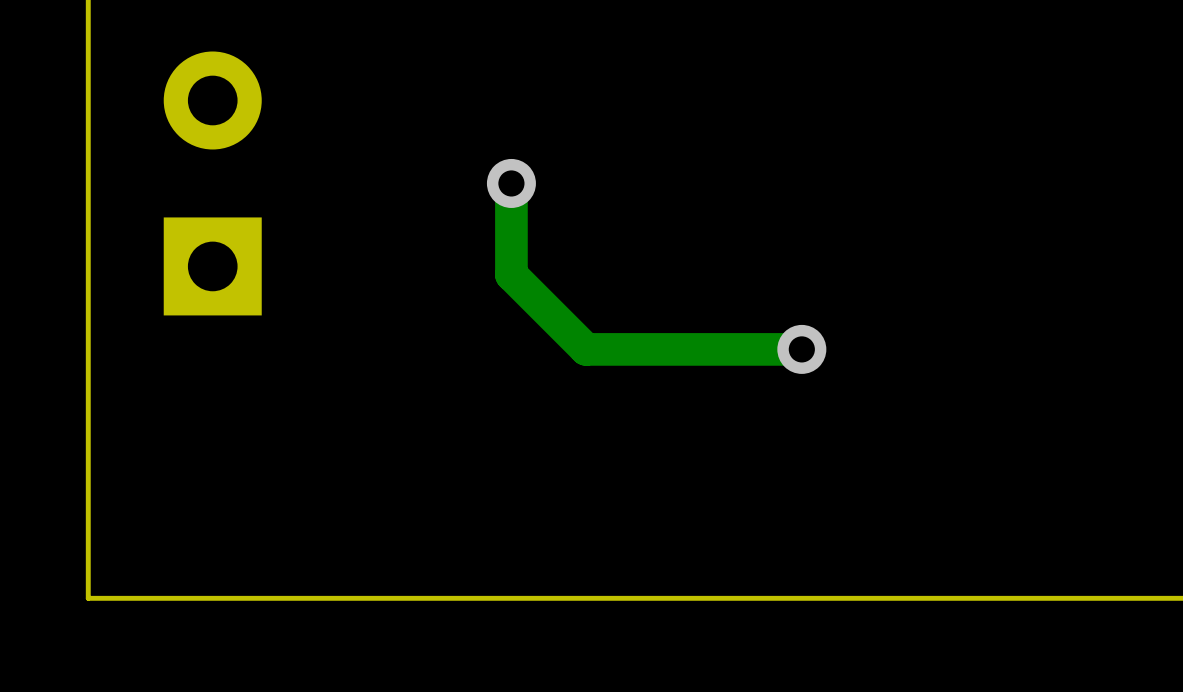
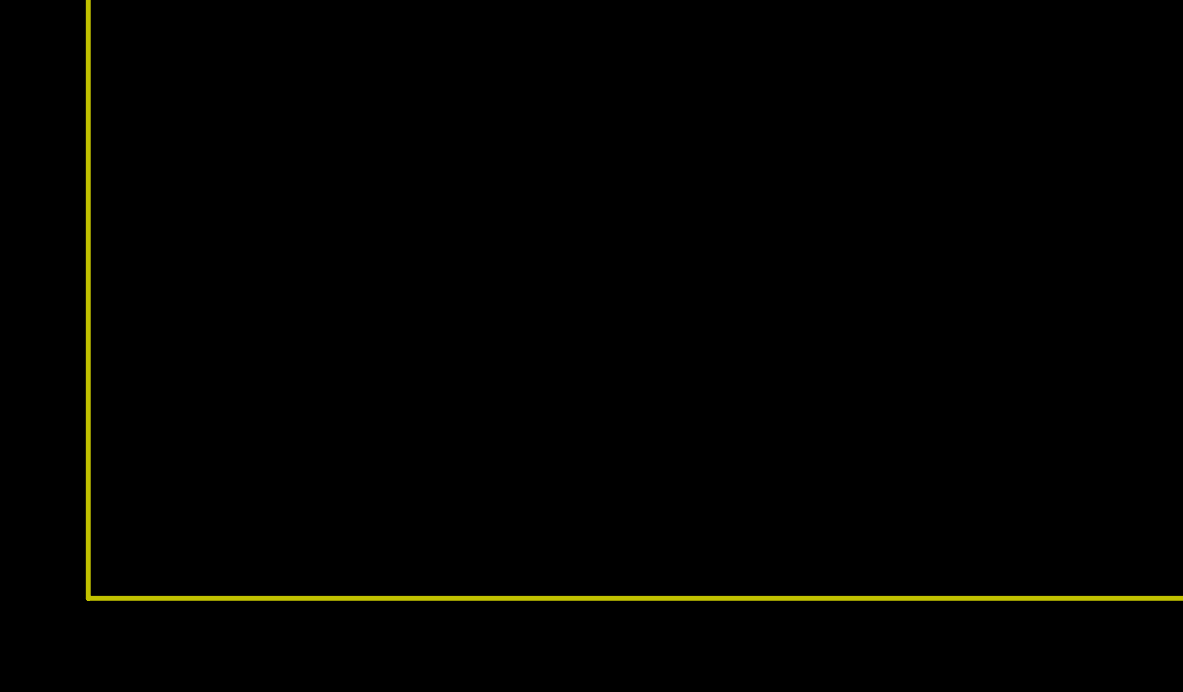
part: (212, 183) -> none
track: (511, 183) (511, 274) (586, 349) (801, 349) -> none
via: (511, 183) -> none
via: (801, 349) -> none

